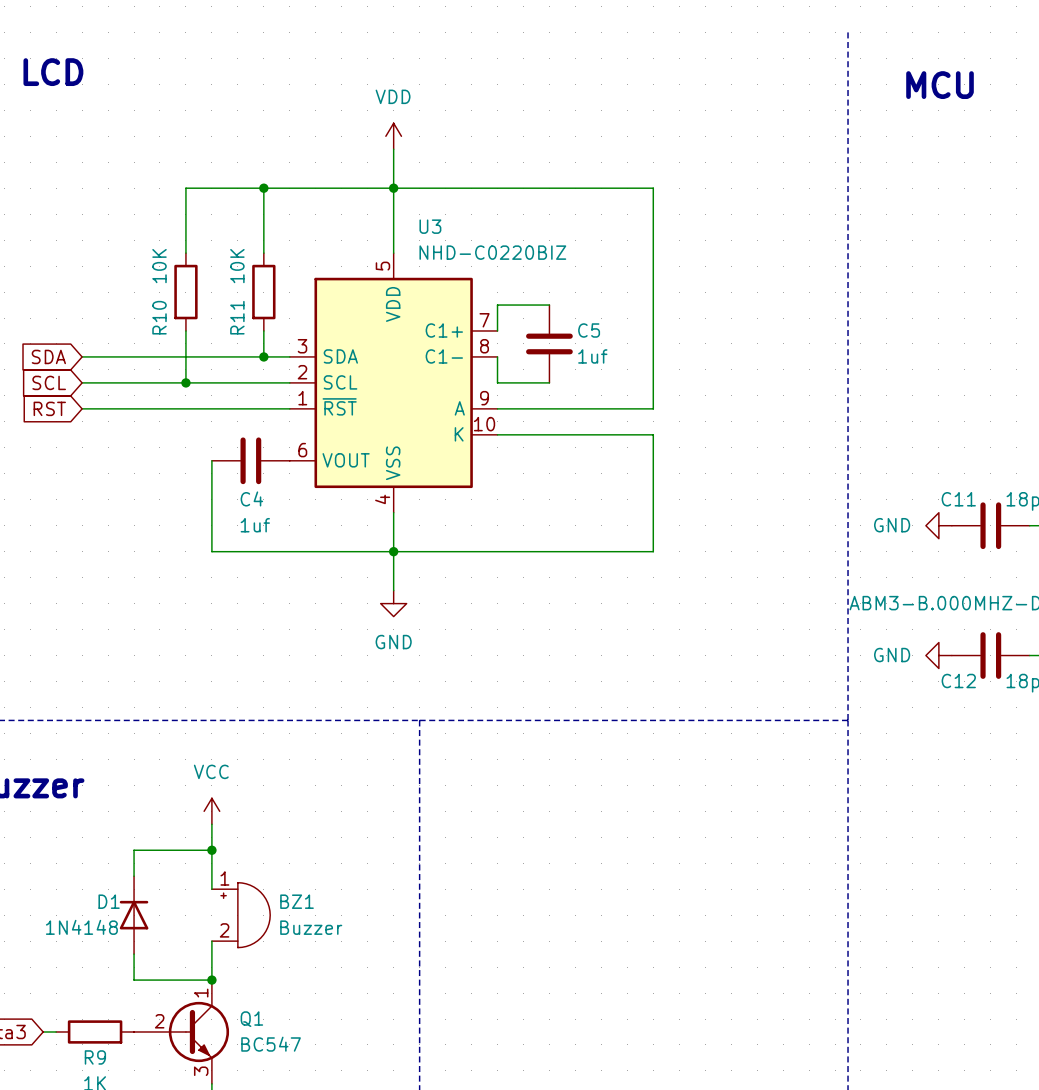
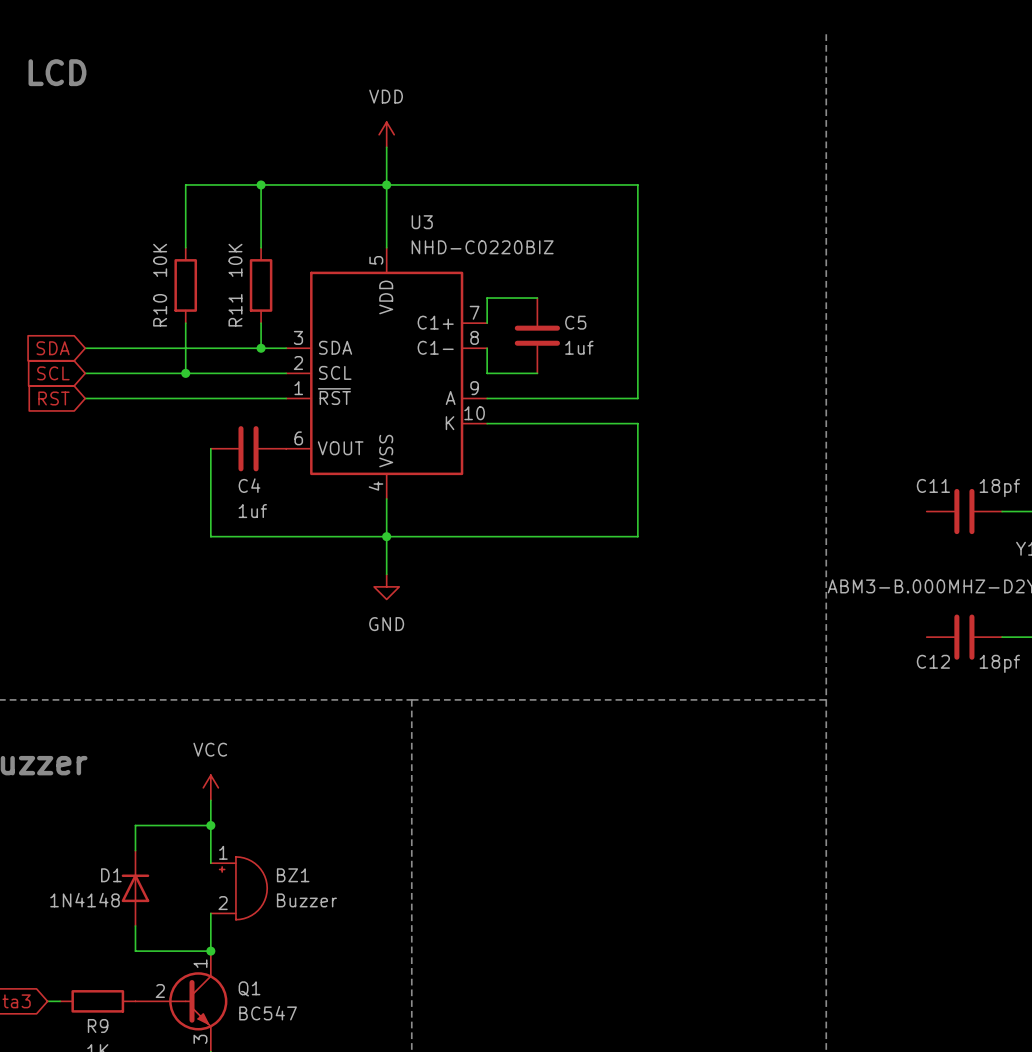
text: MCU (940, 85) -> none
power symbol: GND (938, 525) -> none
power symbol: GND (938, 655) -> none

